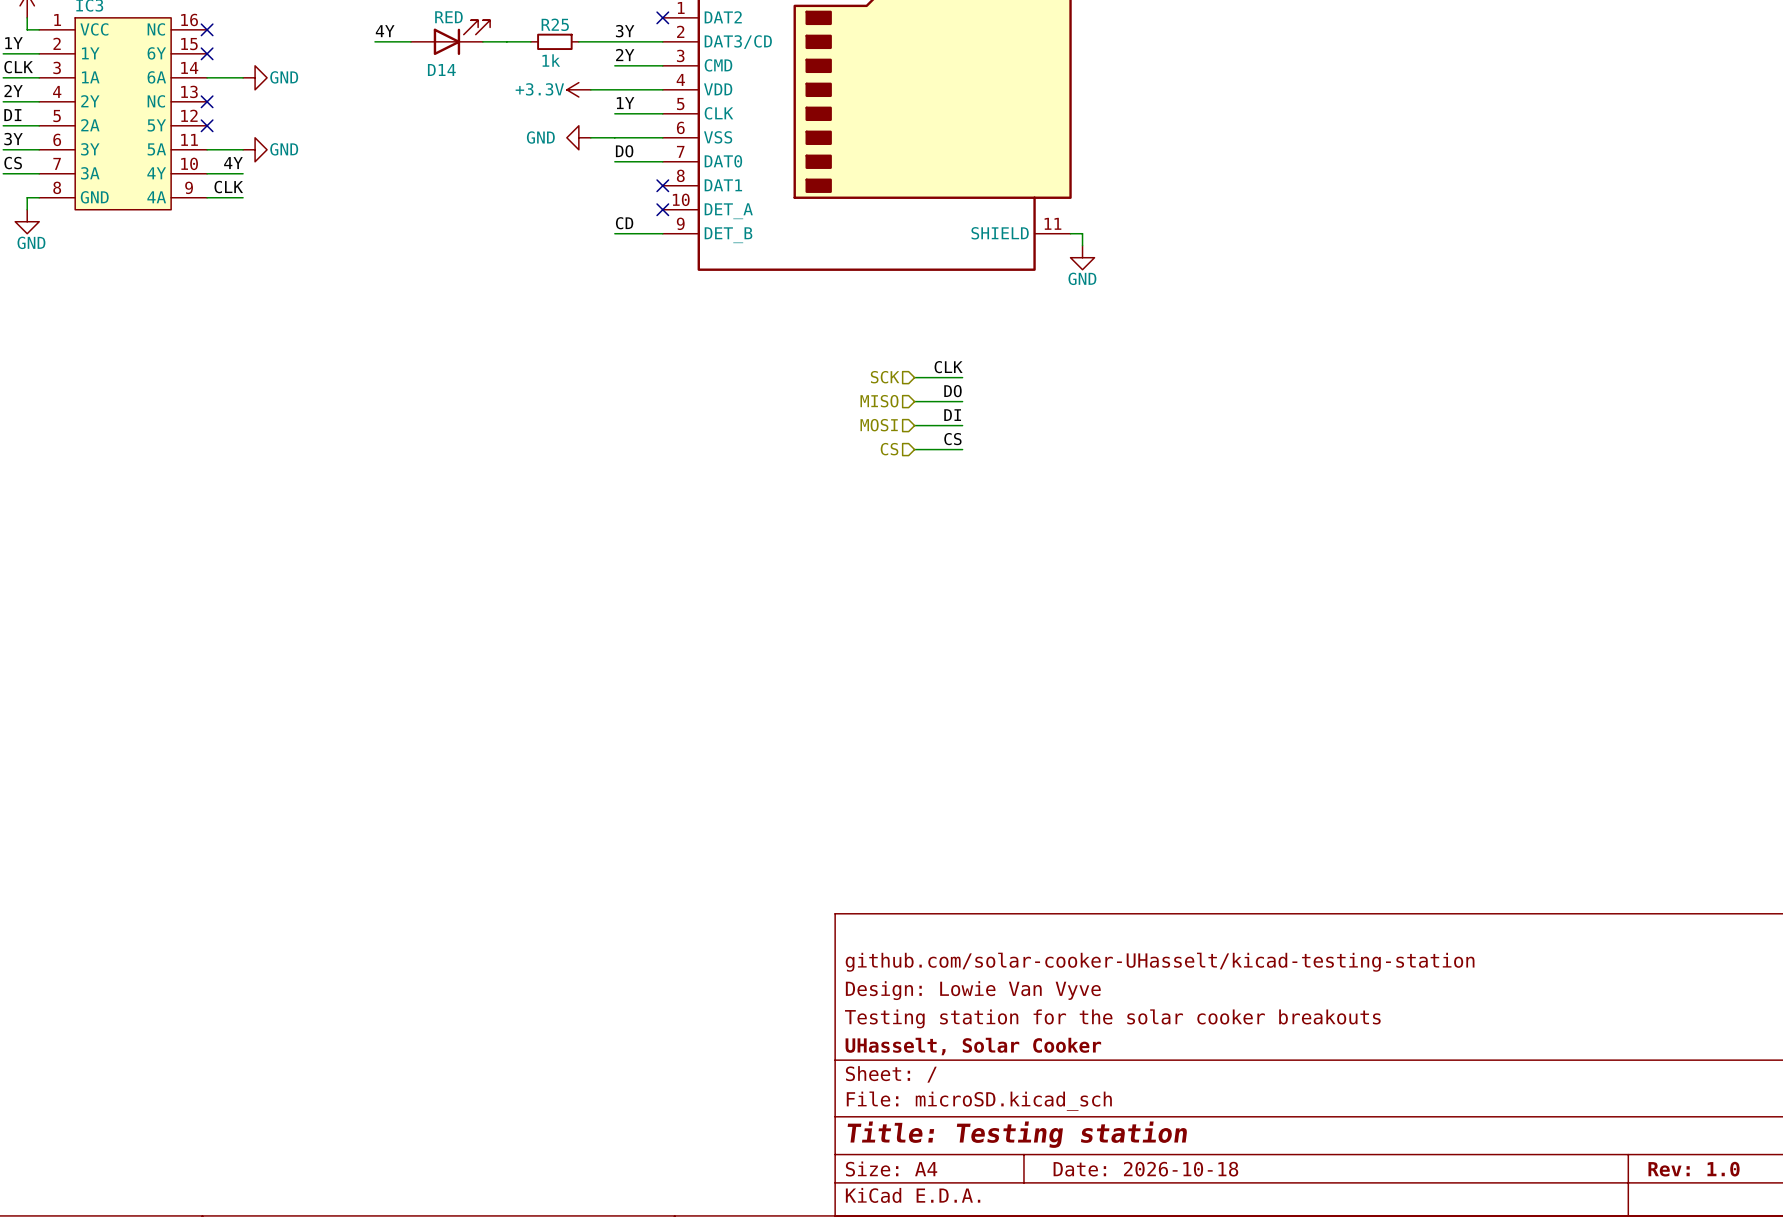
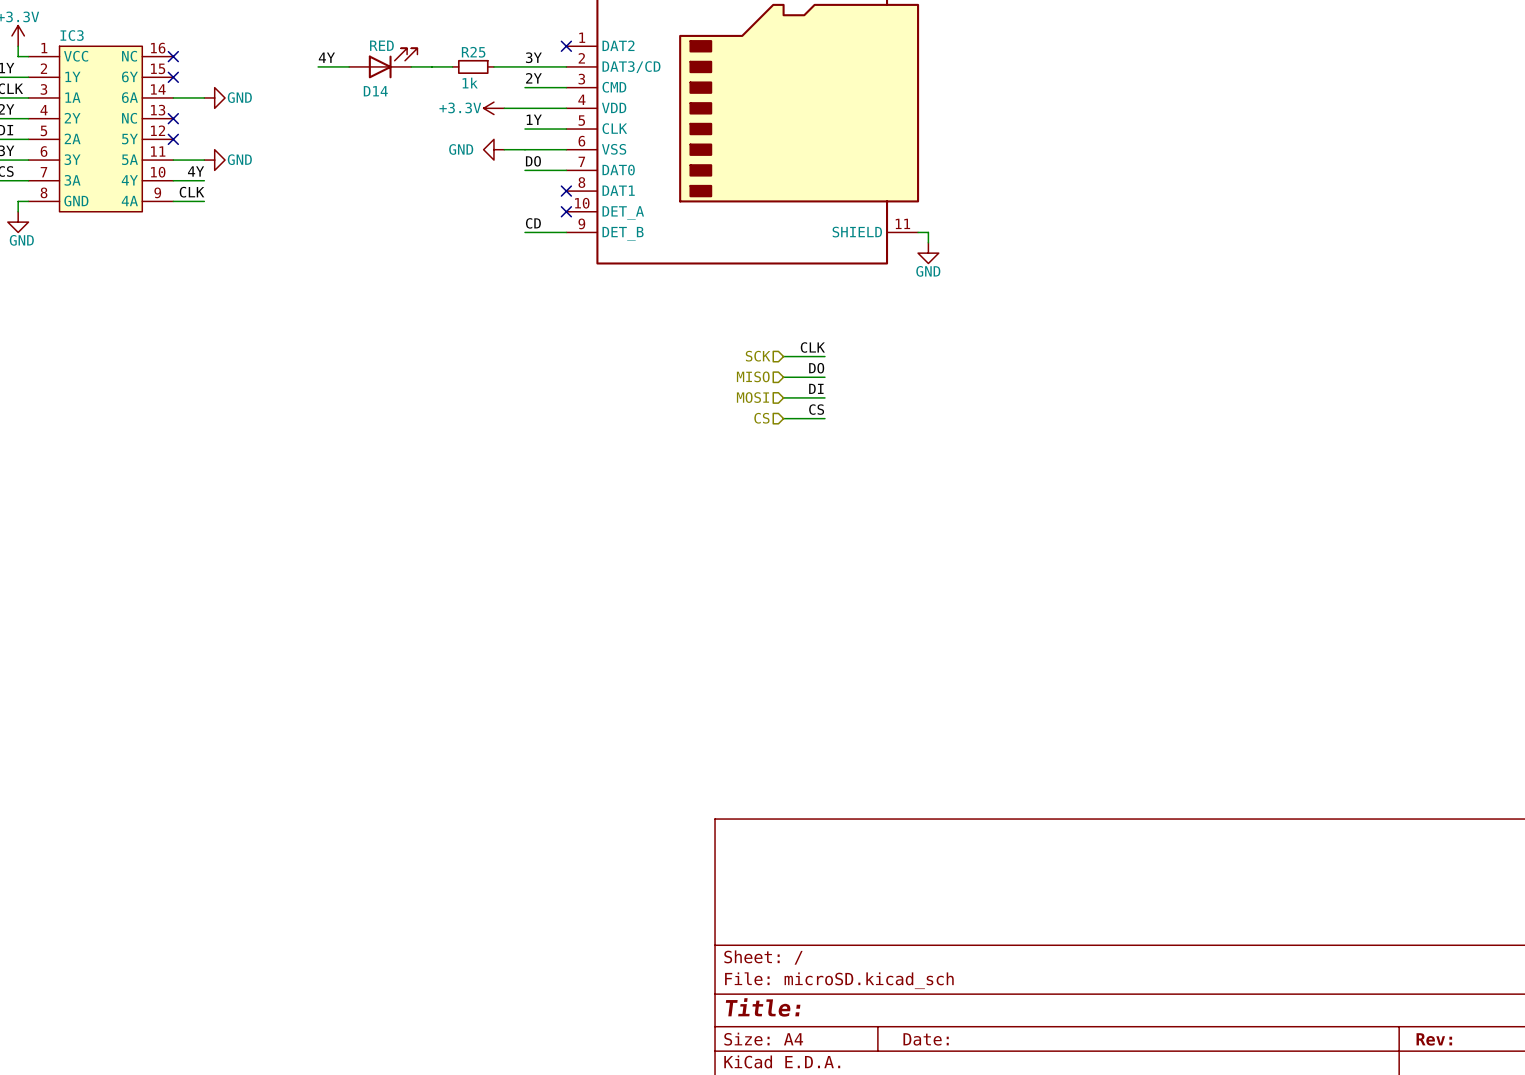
title block: github.com/solar-cooker-UHasselt/kicad-testing-station (1160, 962) -> none
title block: Design: Lowie Van Vyve (973, 990) -> none
title block: Testing station for the solar cooker breakouts (1112, 1018) -> none
title block: UHasselt, Solar Cooker (973, 1046) -> none
title block: Title: Testing station (1017, 1134) -> Title: (763, 1007)
title block: Date: 2026-10-18 (1145, 1169) -> Date: (926, 1039)
title block: Rev: 1.0 (1694, 1169) -> Rev: (1434, 1039)

